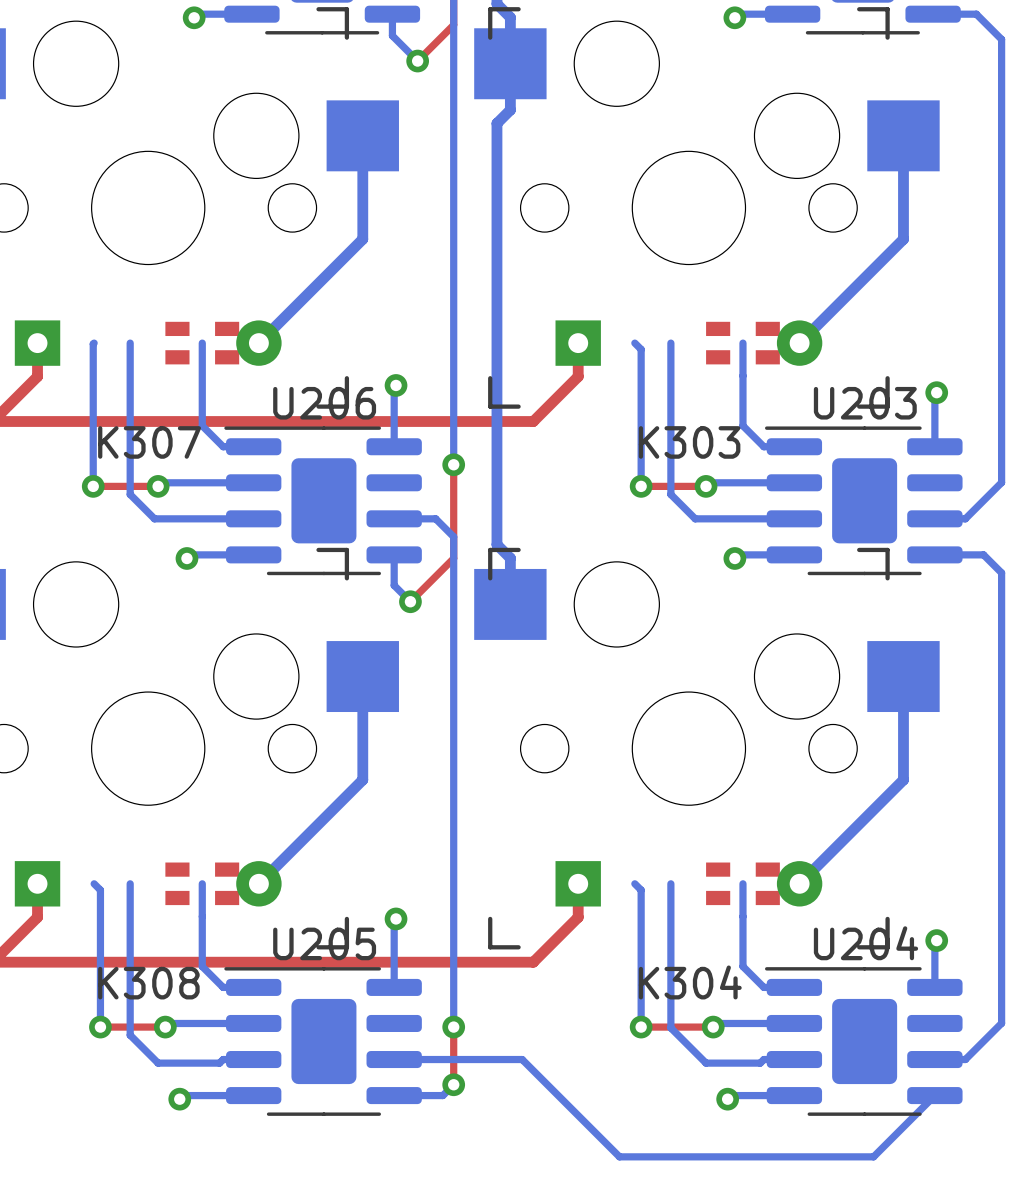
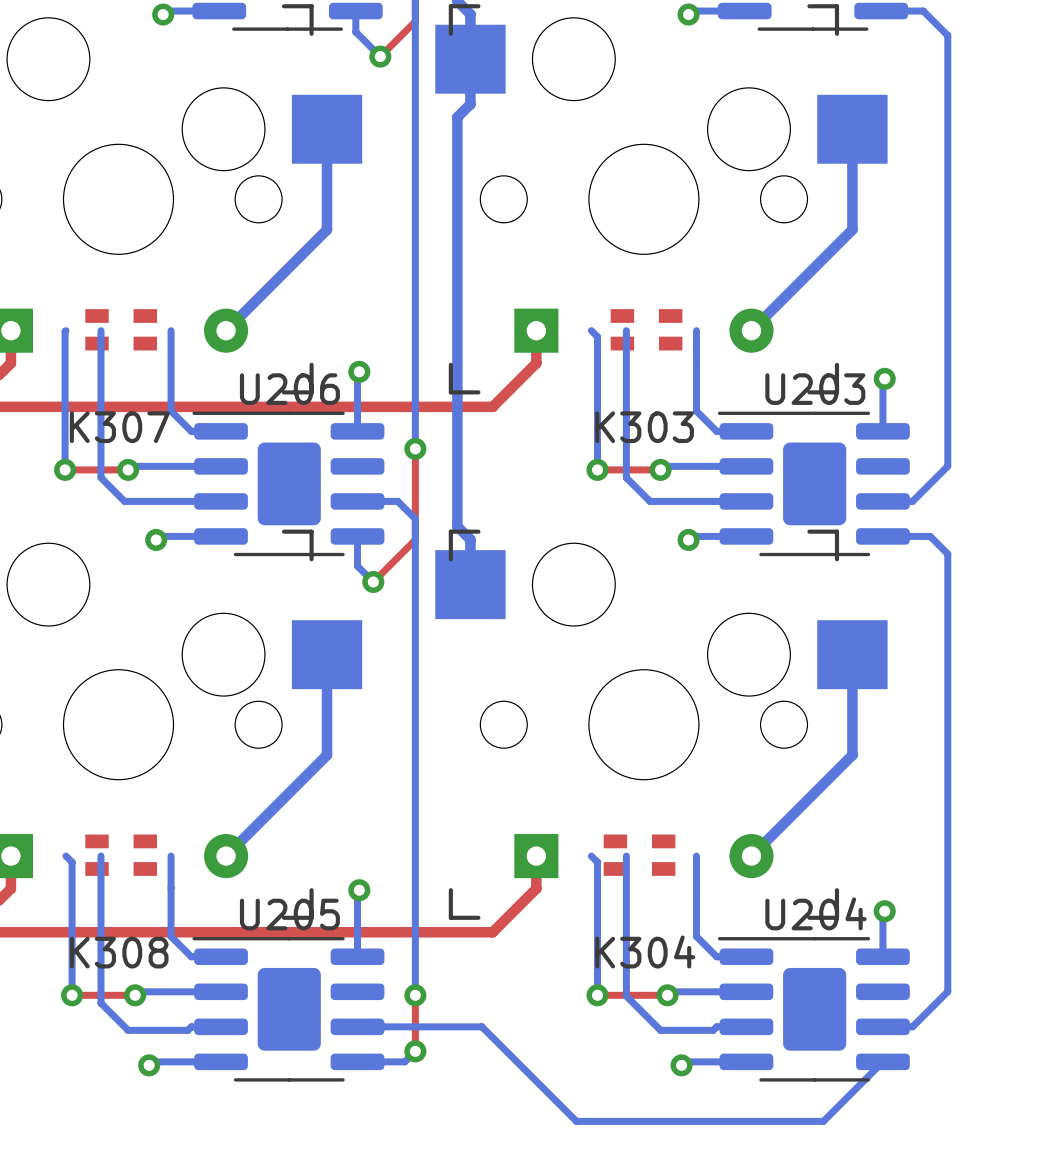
part position: (202, 343) -> (121, 329)
part position: (742, 343) -> (646, 329)
part position: (202, 883) -> (121, 855)
part position: (742, 883) -> (639, 855)

